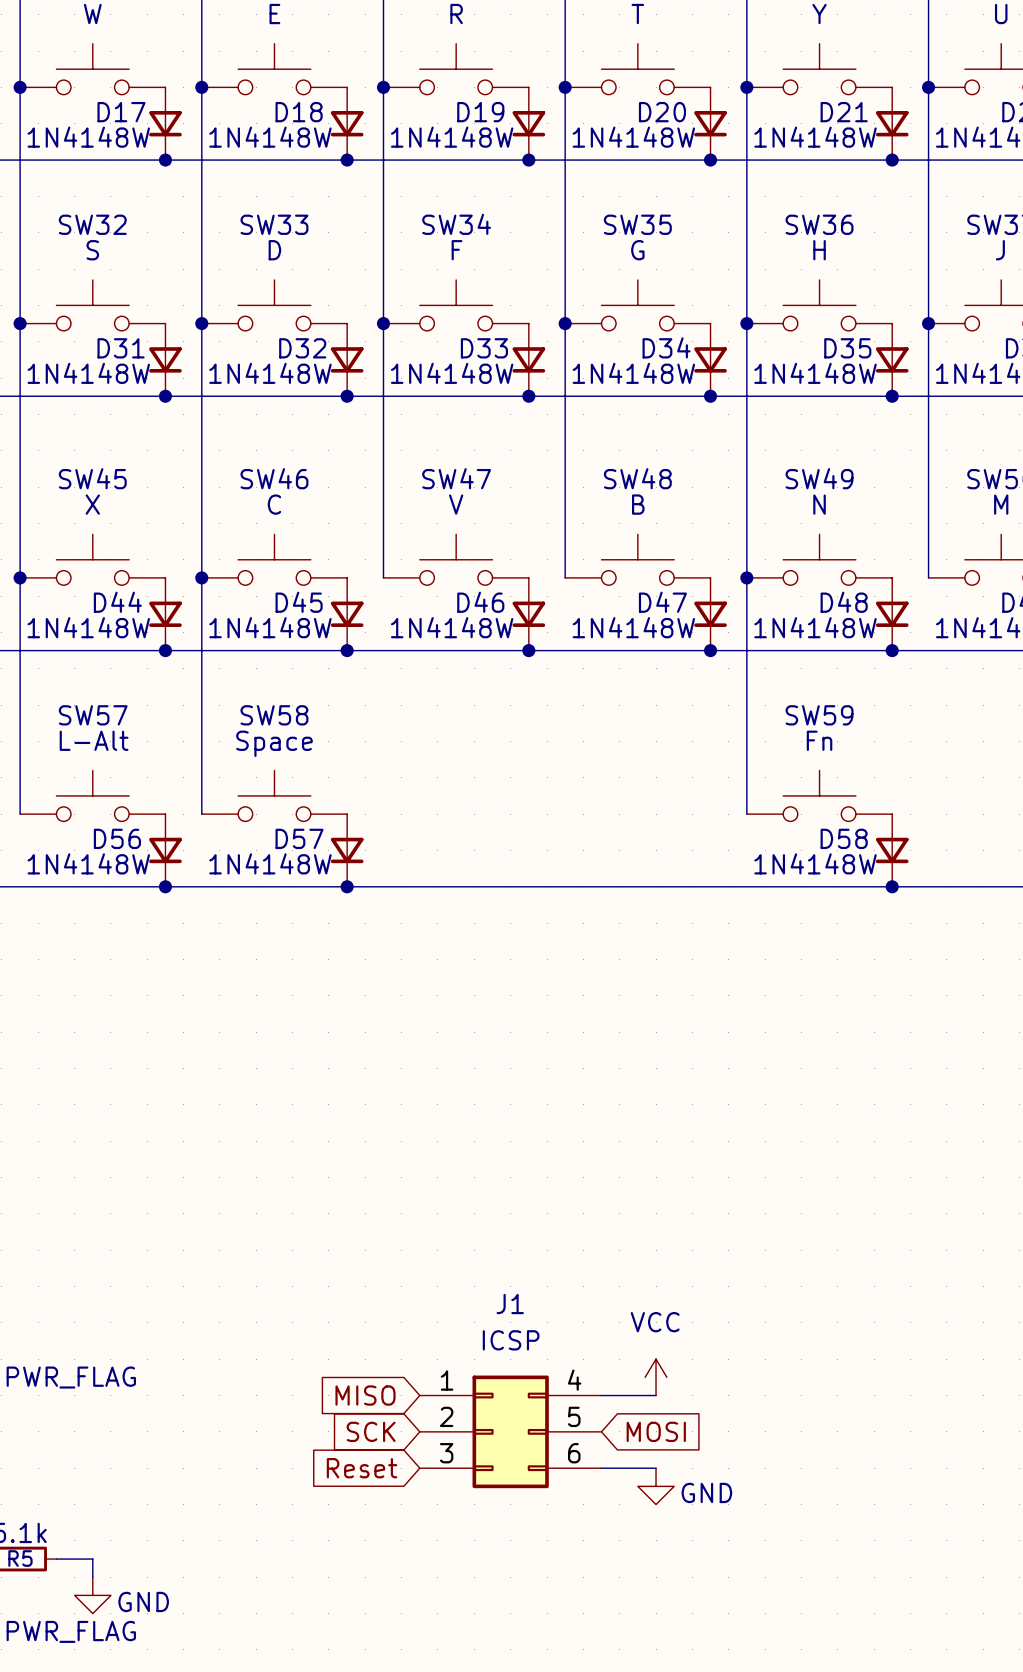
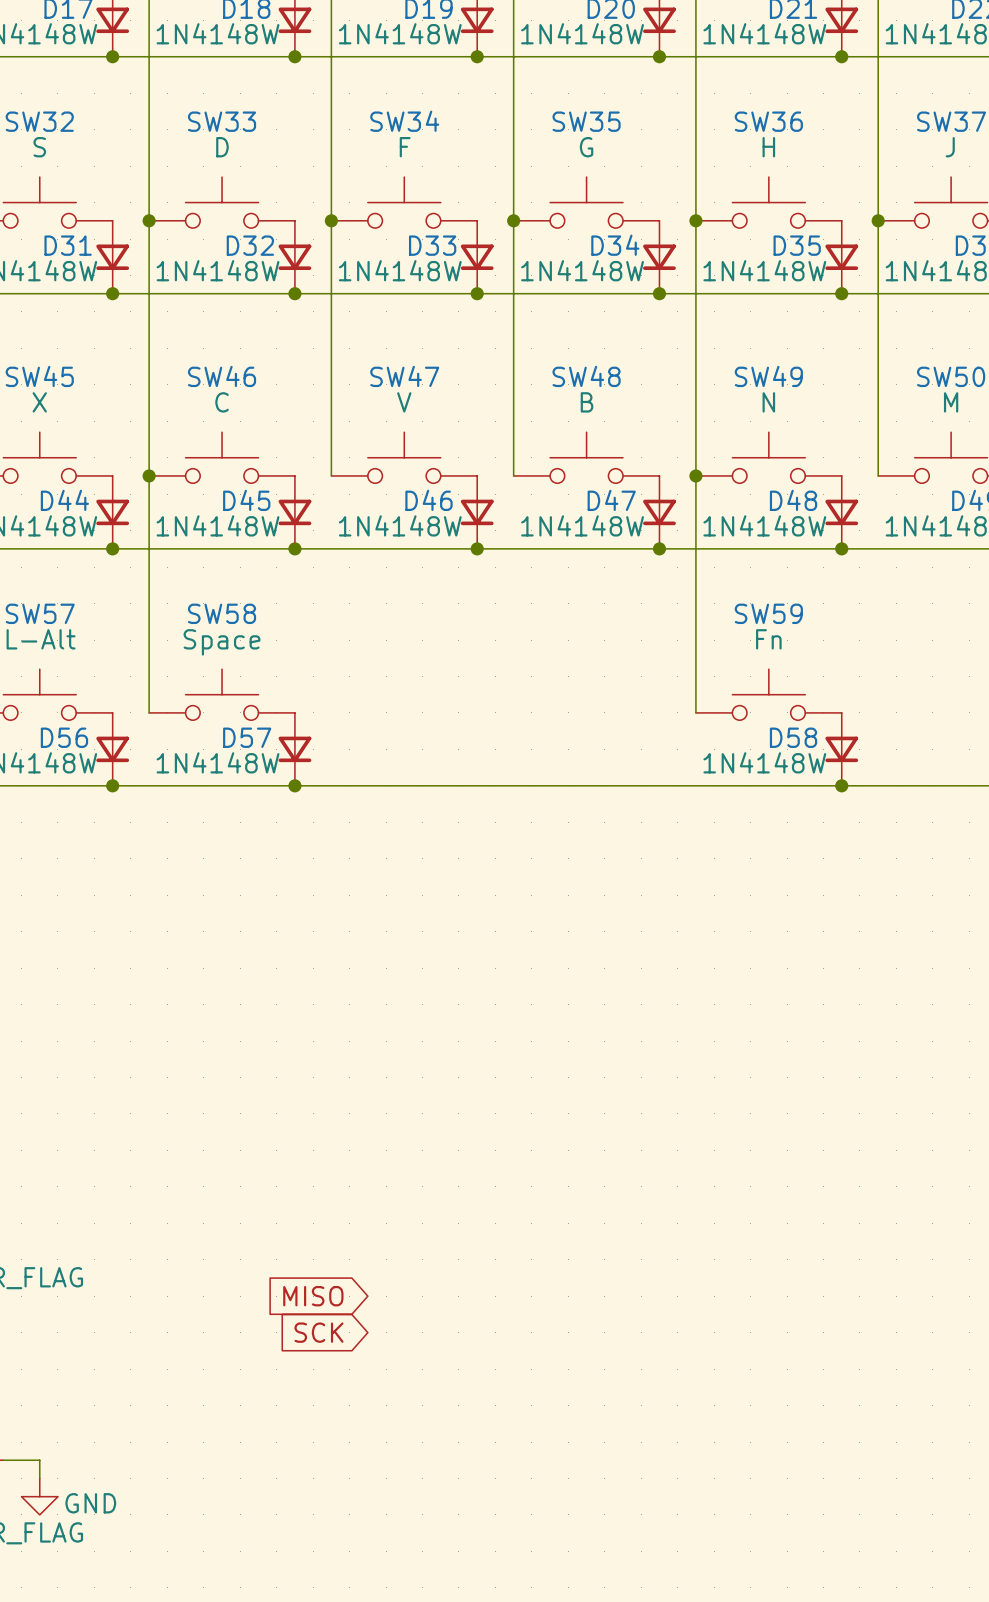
power symbol: VCC (656, 1377) -> none
wire: (601, 1395) (656, 1395) -> none
J1: ICSP (510, 1431) -> none
global label: MOSI (656, 1431) -> none
global label: Reset (362, 1468) -> none
wire: (601, 1468) (656, 1468) -> none
power symbol: GND (656, 1486) -> none

